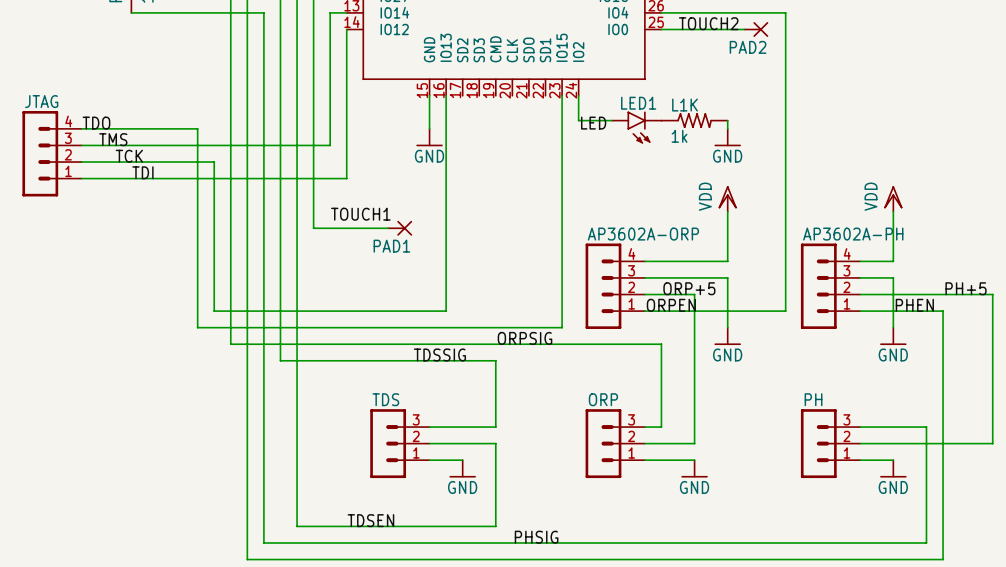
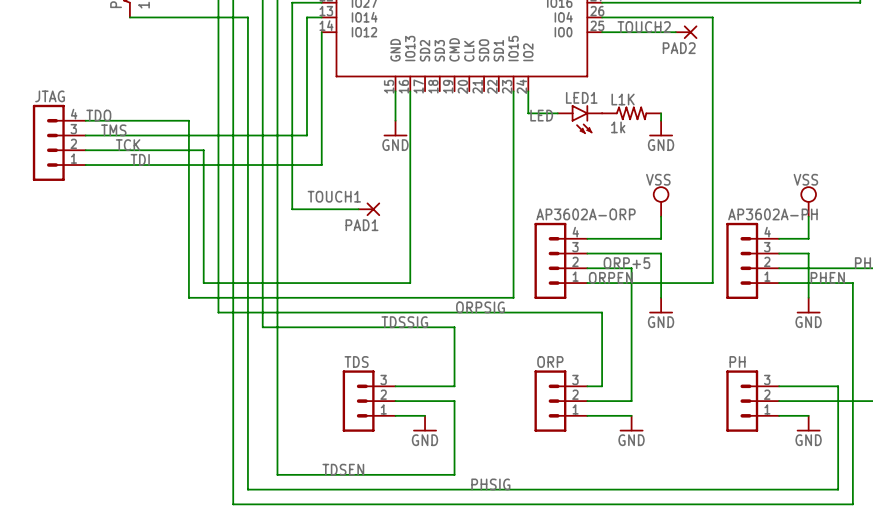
power symbol: VDD (727, 198) -> none
power symbol: VDD (893, 198) -> none
power symbol: none -> VSS (661, 201)
power symbol: none -> VSS (808, 201)

